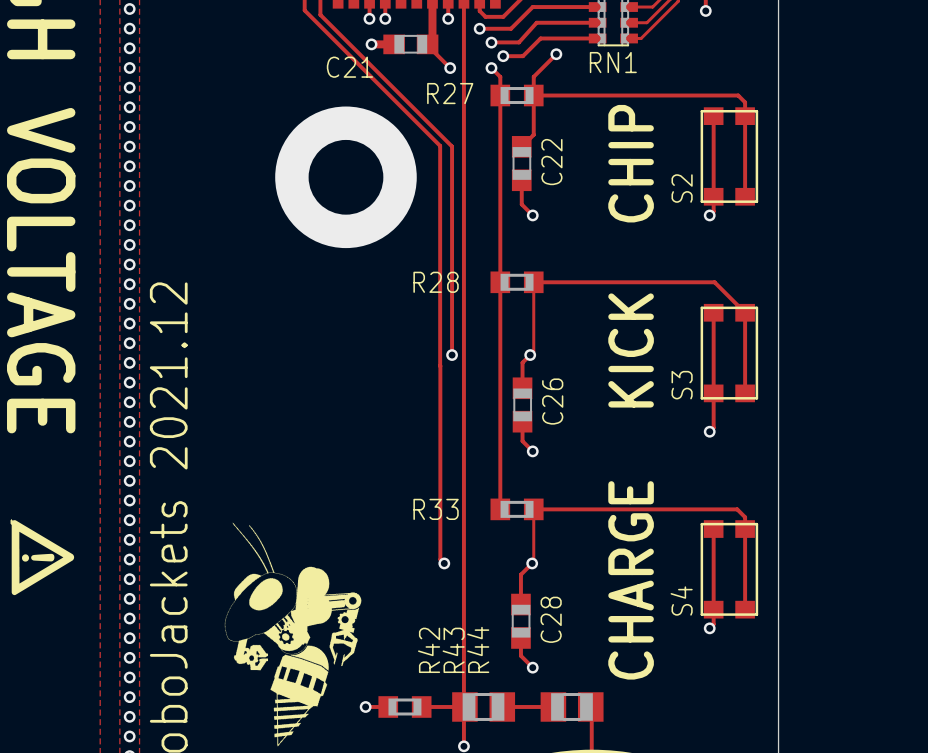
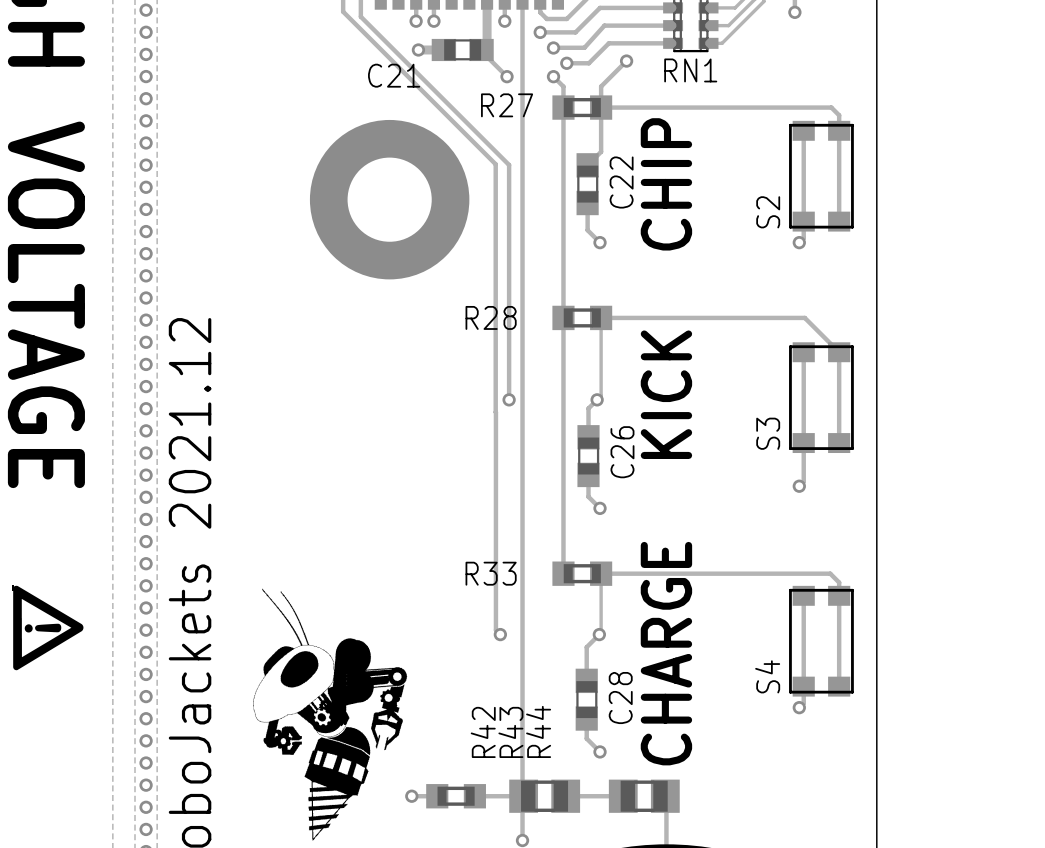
text position: CHIP (631, 163) -> CHIP (666, 184)
text position: KICK (631, 350) -> KICK (666, 394)
text position: CHARGE (631, 580) -> CHARGE (666, 653)

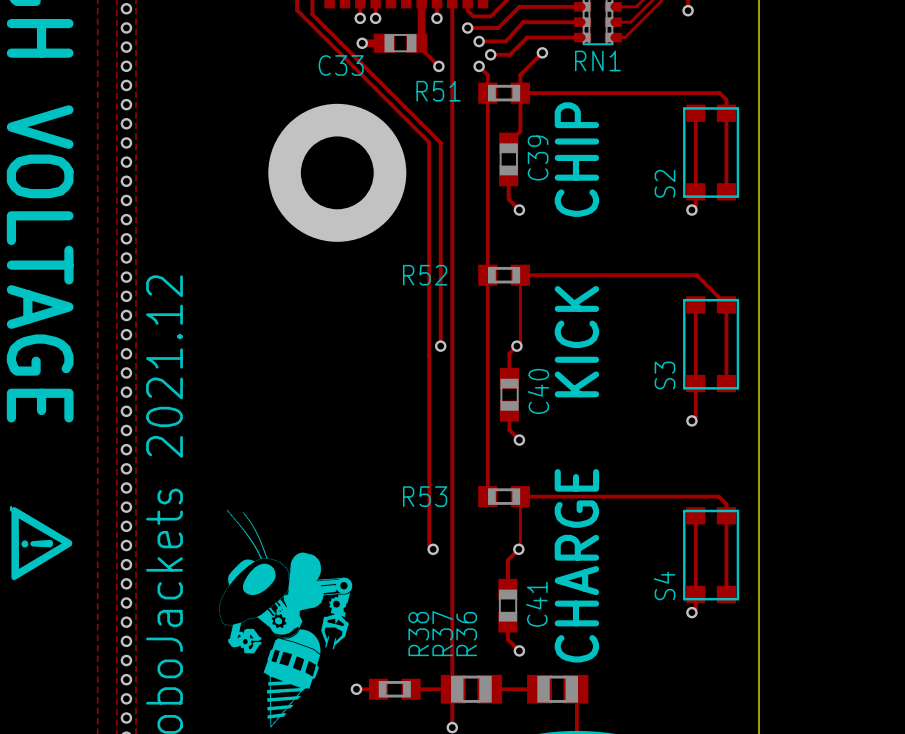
C21 name: C21 (394, 75) -> C33 (341, 65)
R27 name: R27 (507, 105) -> R51 (438, 91)
C22 name: C22 (621, 182) -> C39 (538, 157)
R28 name: R28 (491, 317) -> R52 (425, 275)
C26 name: C26 (622, 452) -> C40 (538, 391)
R33 name: R33 (491, 573) -> R53 (425, 496)
C28 name: C28 (620, 698) -> C41 (536, 604)
R44 name: R44 (538, 731) -> R36 (466, 634)
R42 name: R42 (483, 732) -> R38 (418, 634)
R43 name: R43 (510, 732) -> R37 (442, 633)

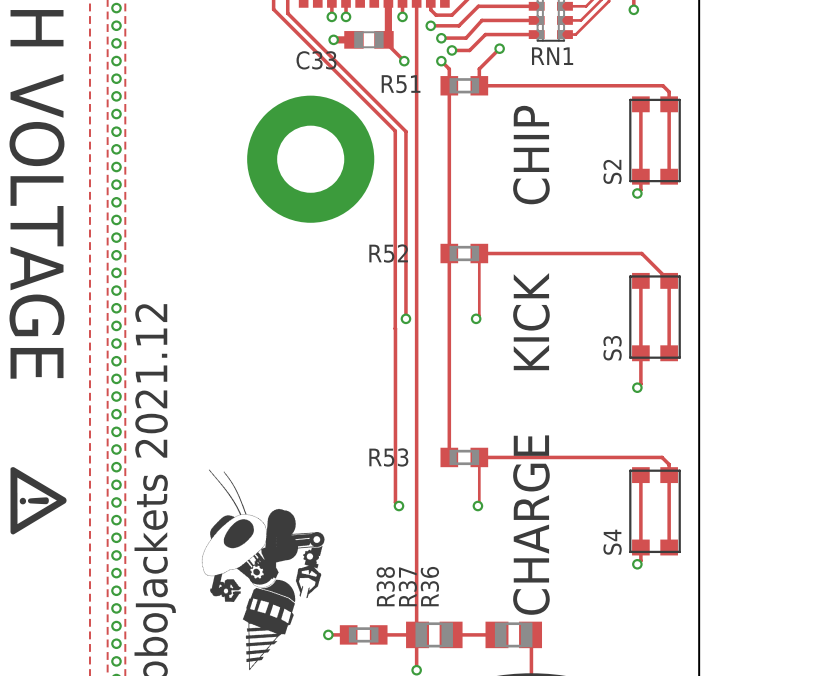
track: (520, 93) (520, 131) (508, 143) -> none
C39: (508, 159) -> none
track: (508, 175) (508, 199) (519, 210) -> none
via: (519, 210) -> none
track: (516, 346) (509, 353) (509, 378) -> none
C40: (509, 394) -> none
track: (509, 411) (509, 430) (519, 440) -> none
via: (519, 440) -> none
track: (518, 549) (507, 560) (507, 589) -> none
C41: (507, 605) -> none
track: (507, 621) (507, 639) (519, 650) -> none
via: (519, 650) -> none

